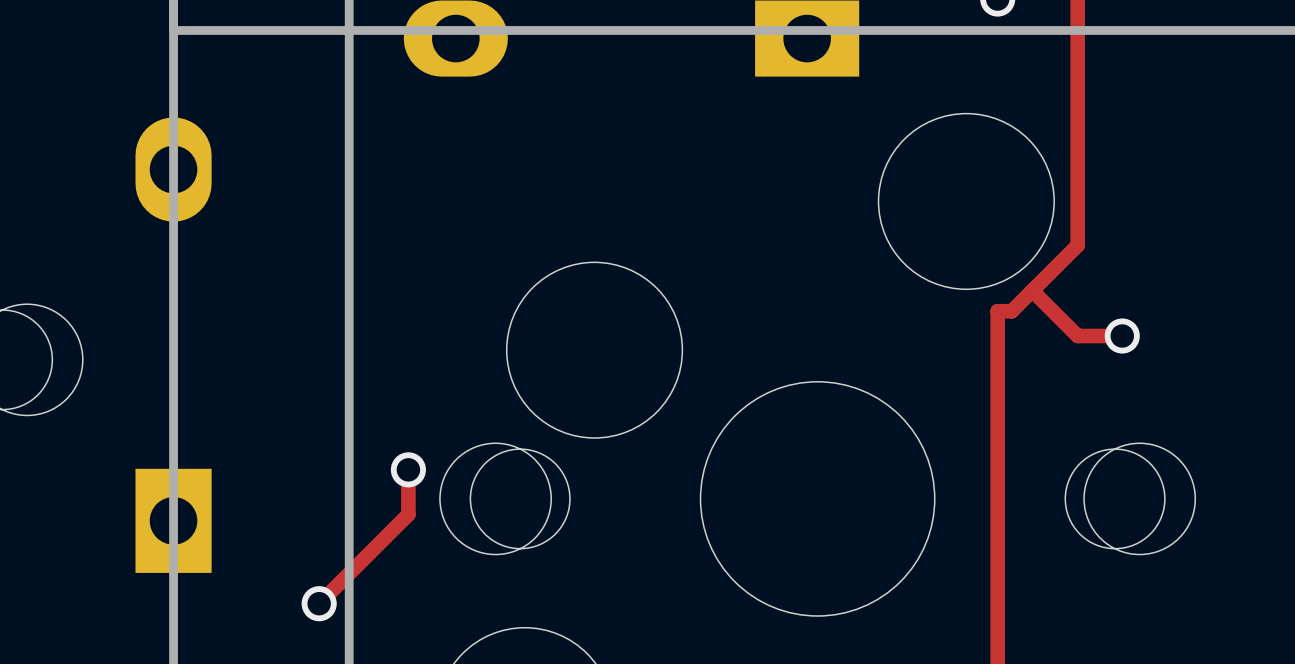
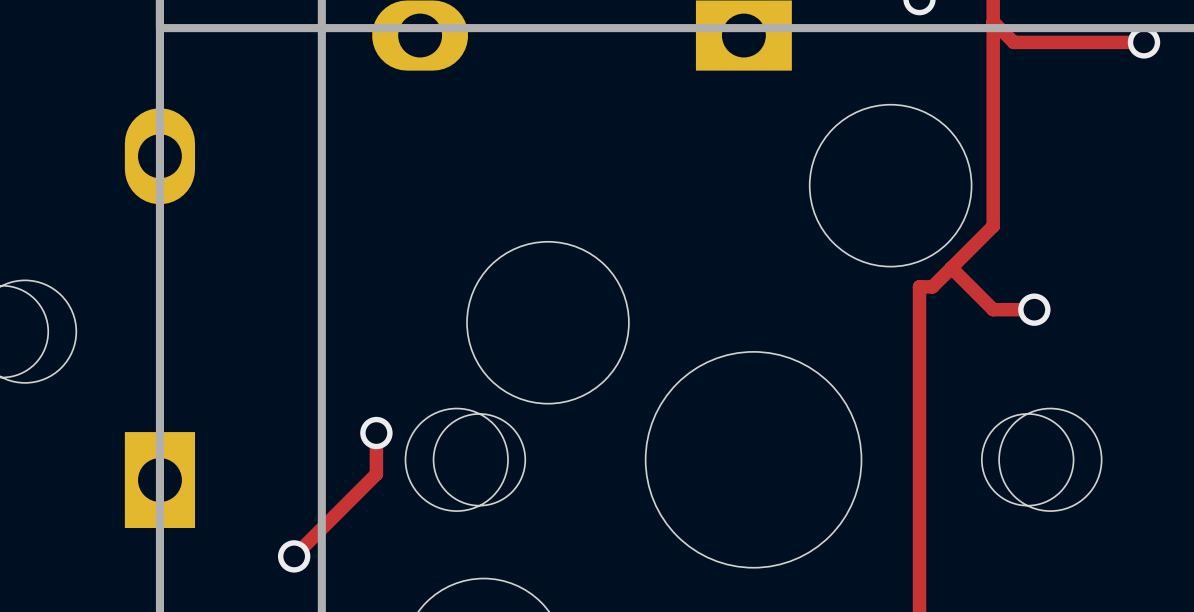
track: none -> (993, 21) (1013, 42) (1144, 42)
via: none -> (1144, 42)

